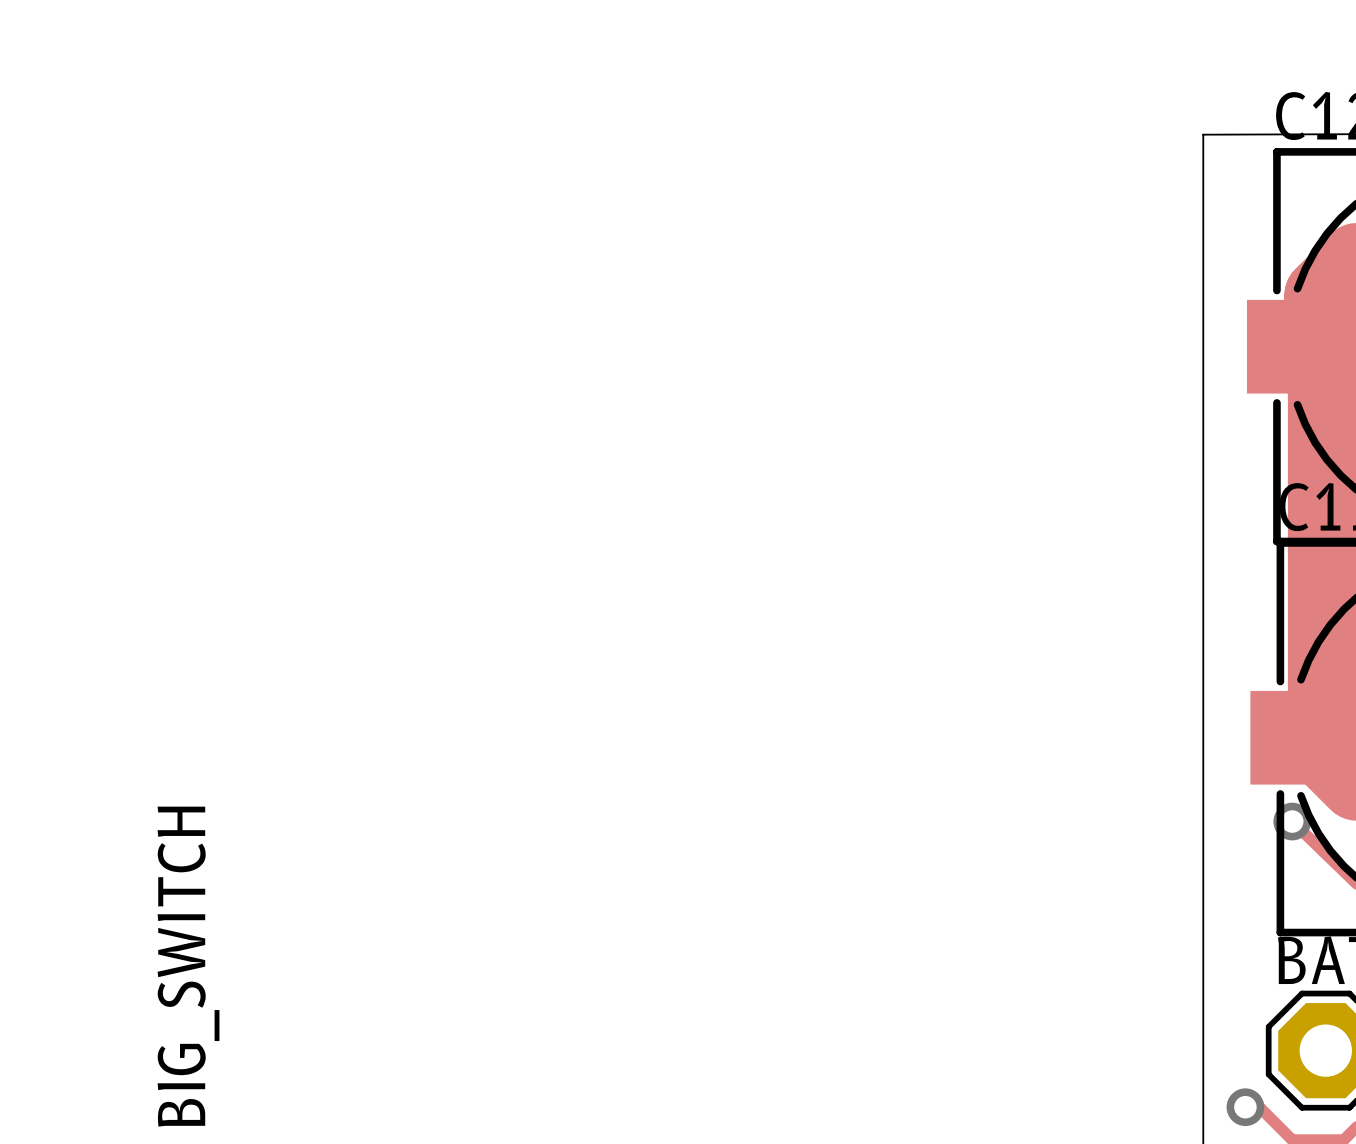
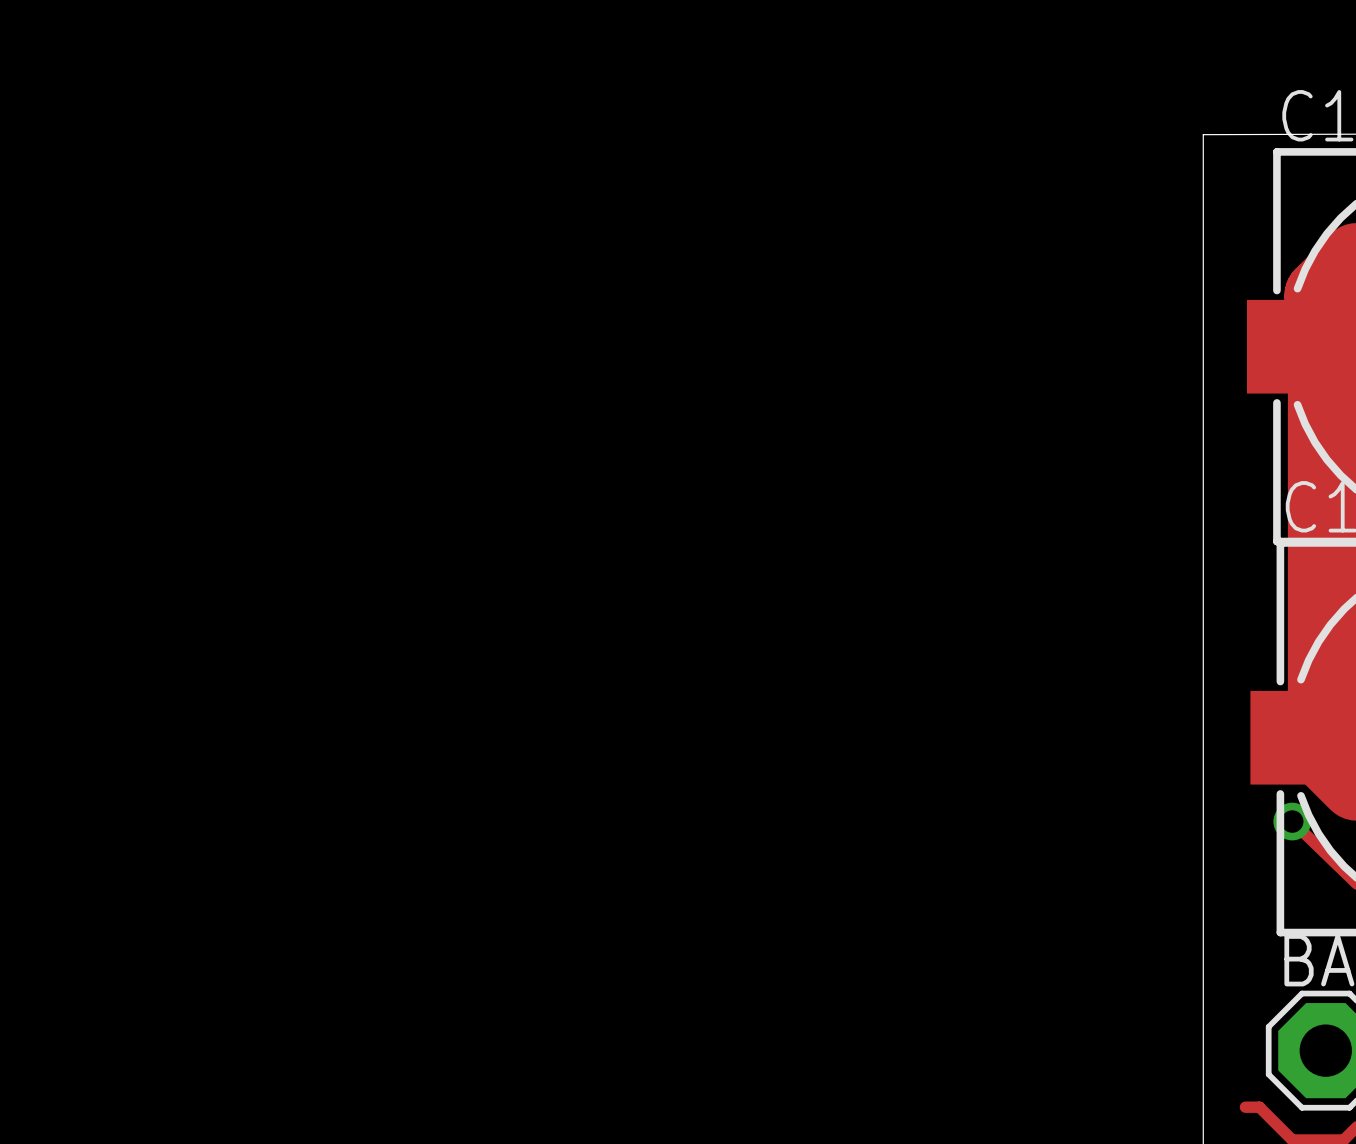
BIG_SWITCH: (188, 966) -> none
via: (1245, 1107) -> none

